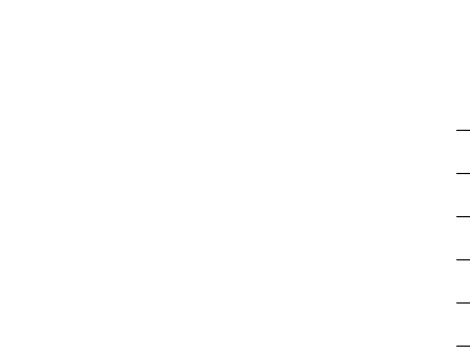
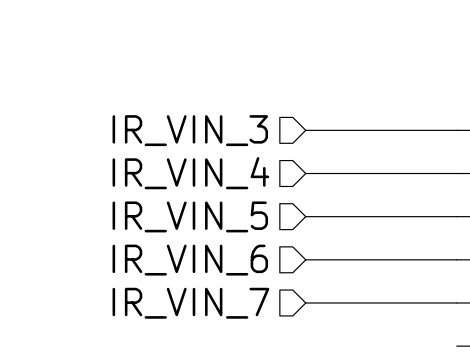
hierarchical label: none -> IR_VIN_3 (190, 130)
wire: none -> (305, 130) (456, 130)
hierarchical label: none -> IR_VIN_4 (190, 173)
wire: none -> (305, 173) (456, 173)
hierarchical label: none -> IR_VIN_5 (190, 216)
wire: none -> (305, 216) (456, 216)
wire: none -> (305, 259) (456, 259)
hierarchical label: none -> IR_VIN_6 (190, 260)
wire: none -> (305, 302) (456, 302)
hierarchical label: none -> IR_VIN_7 (190, 303)

